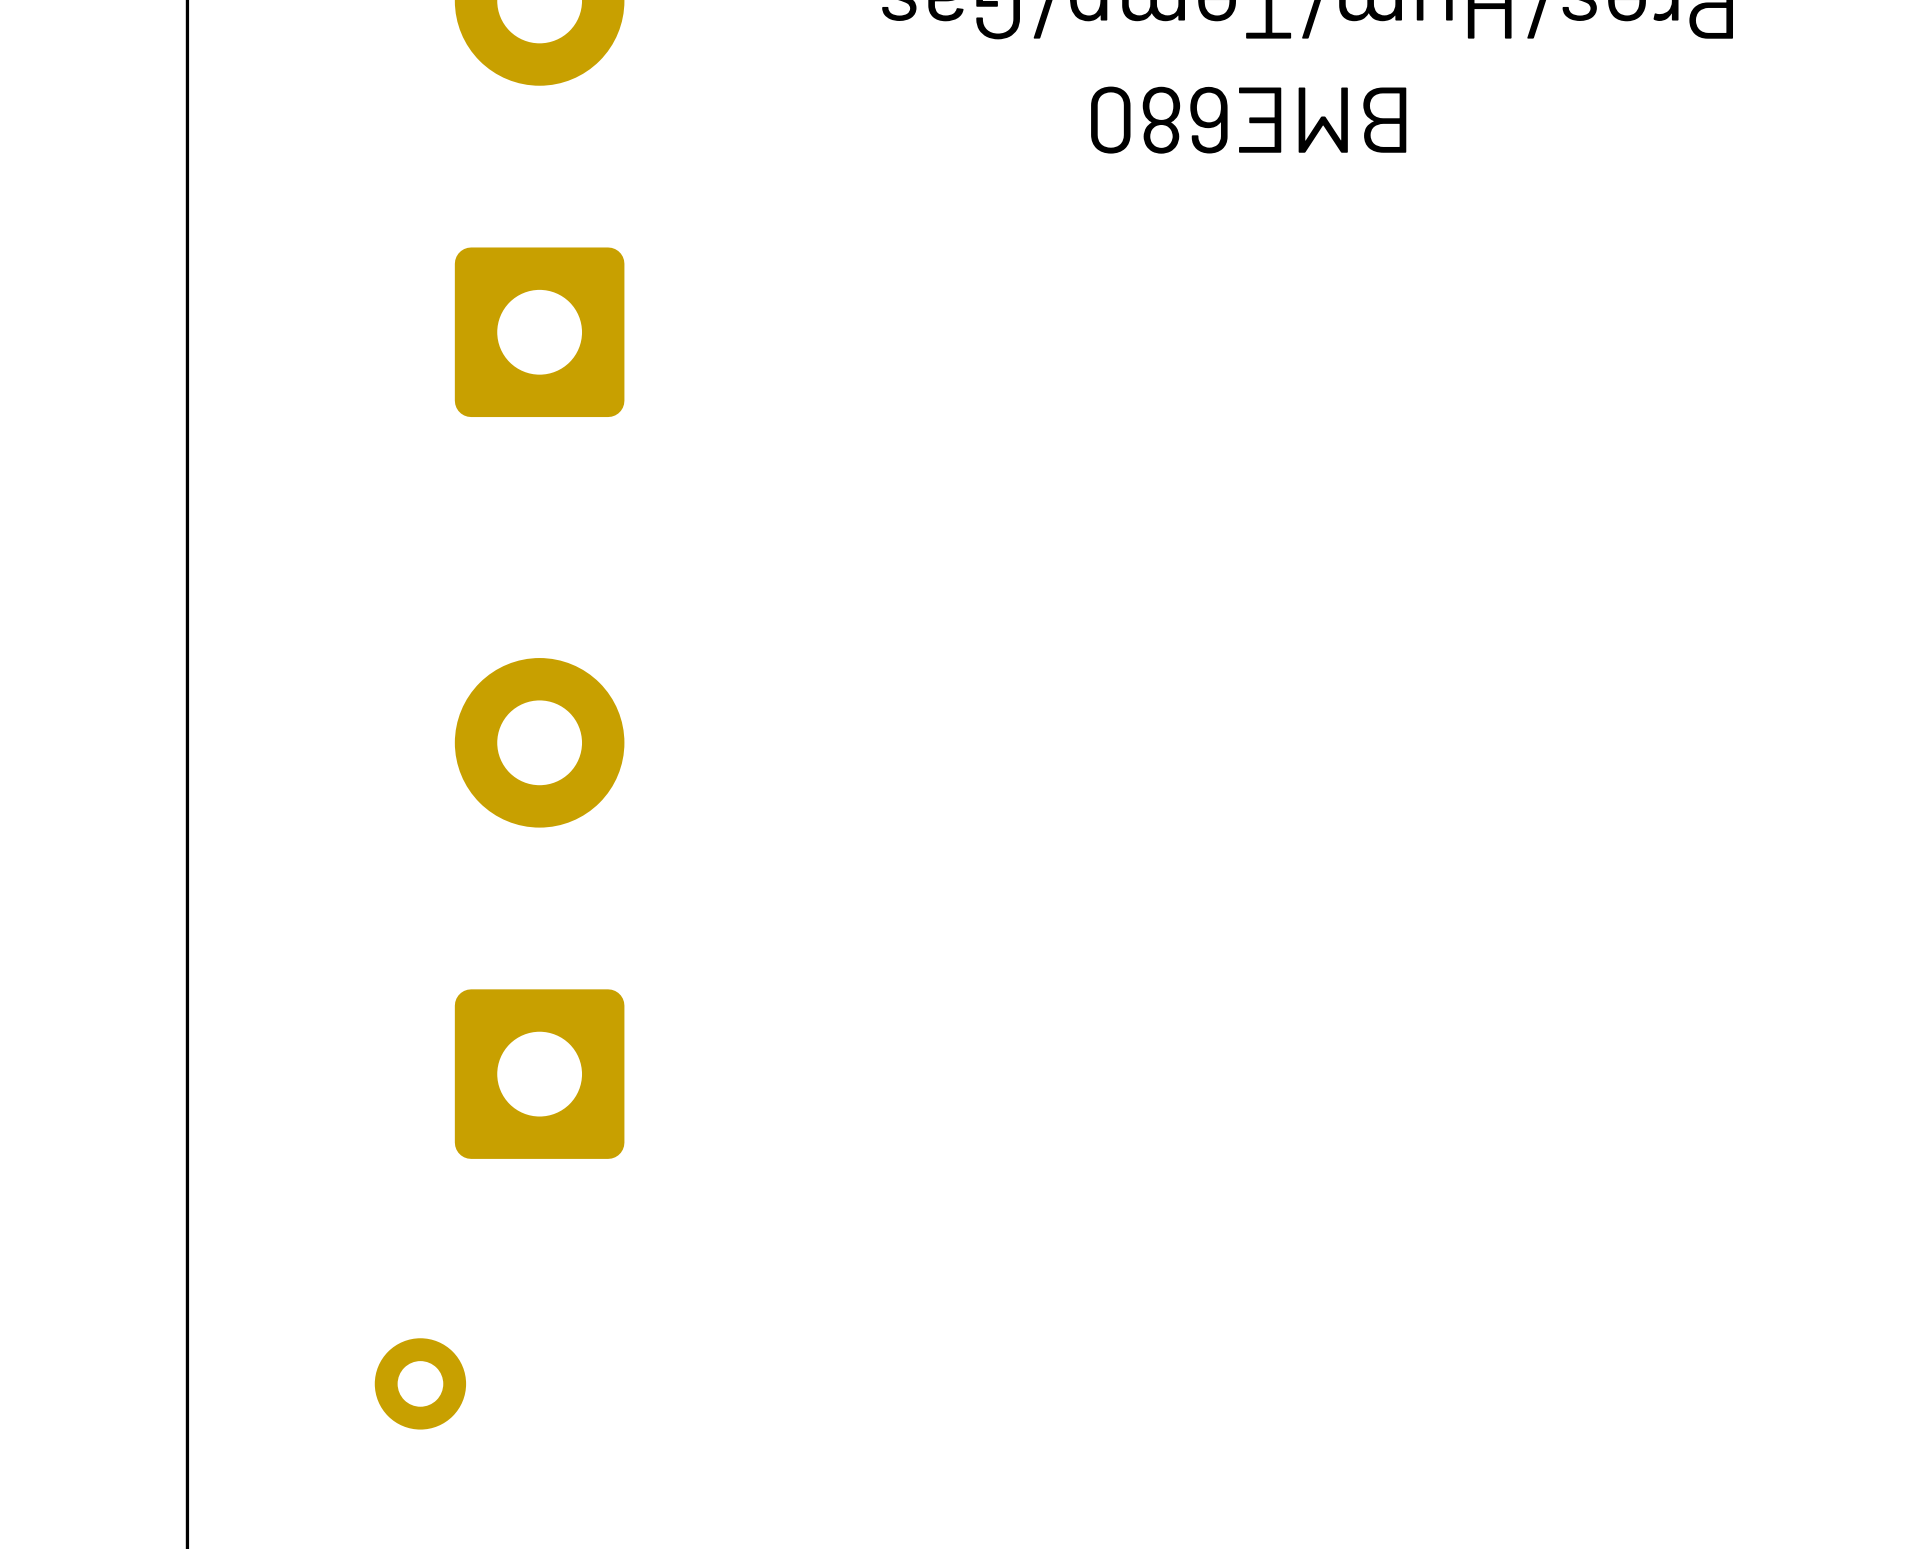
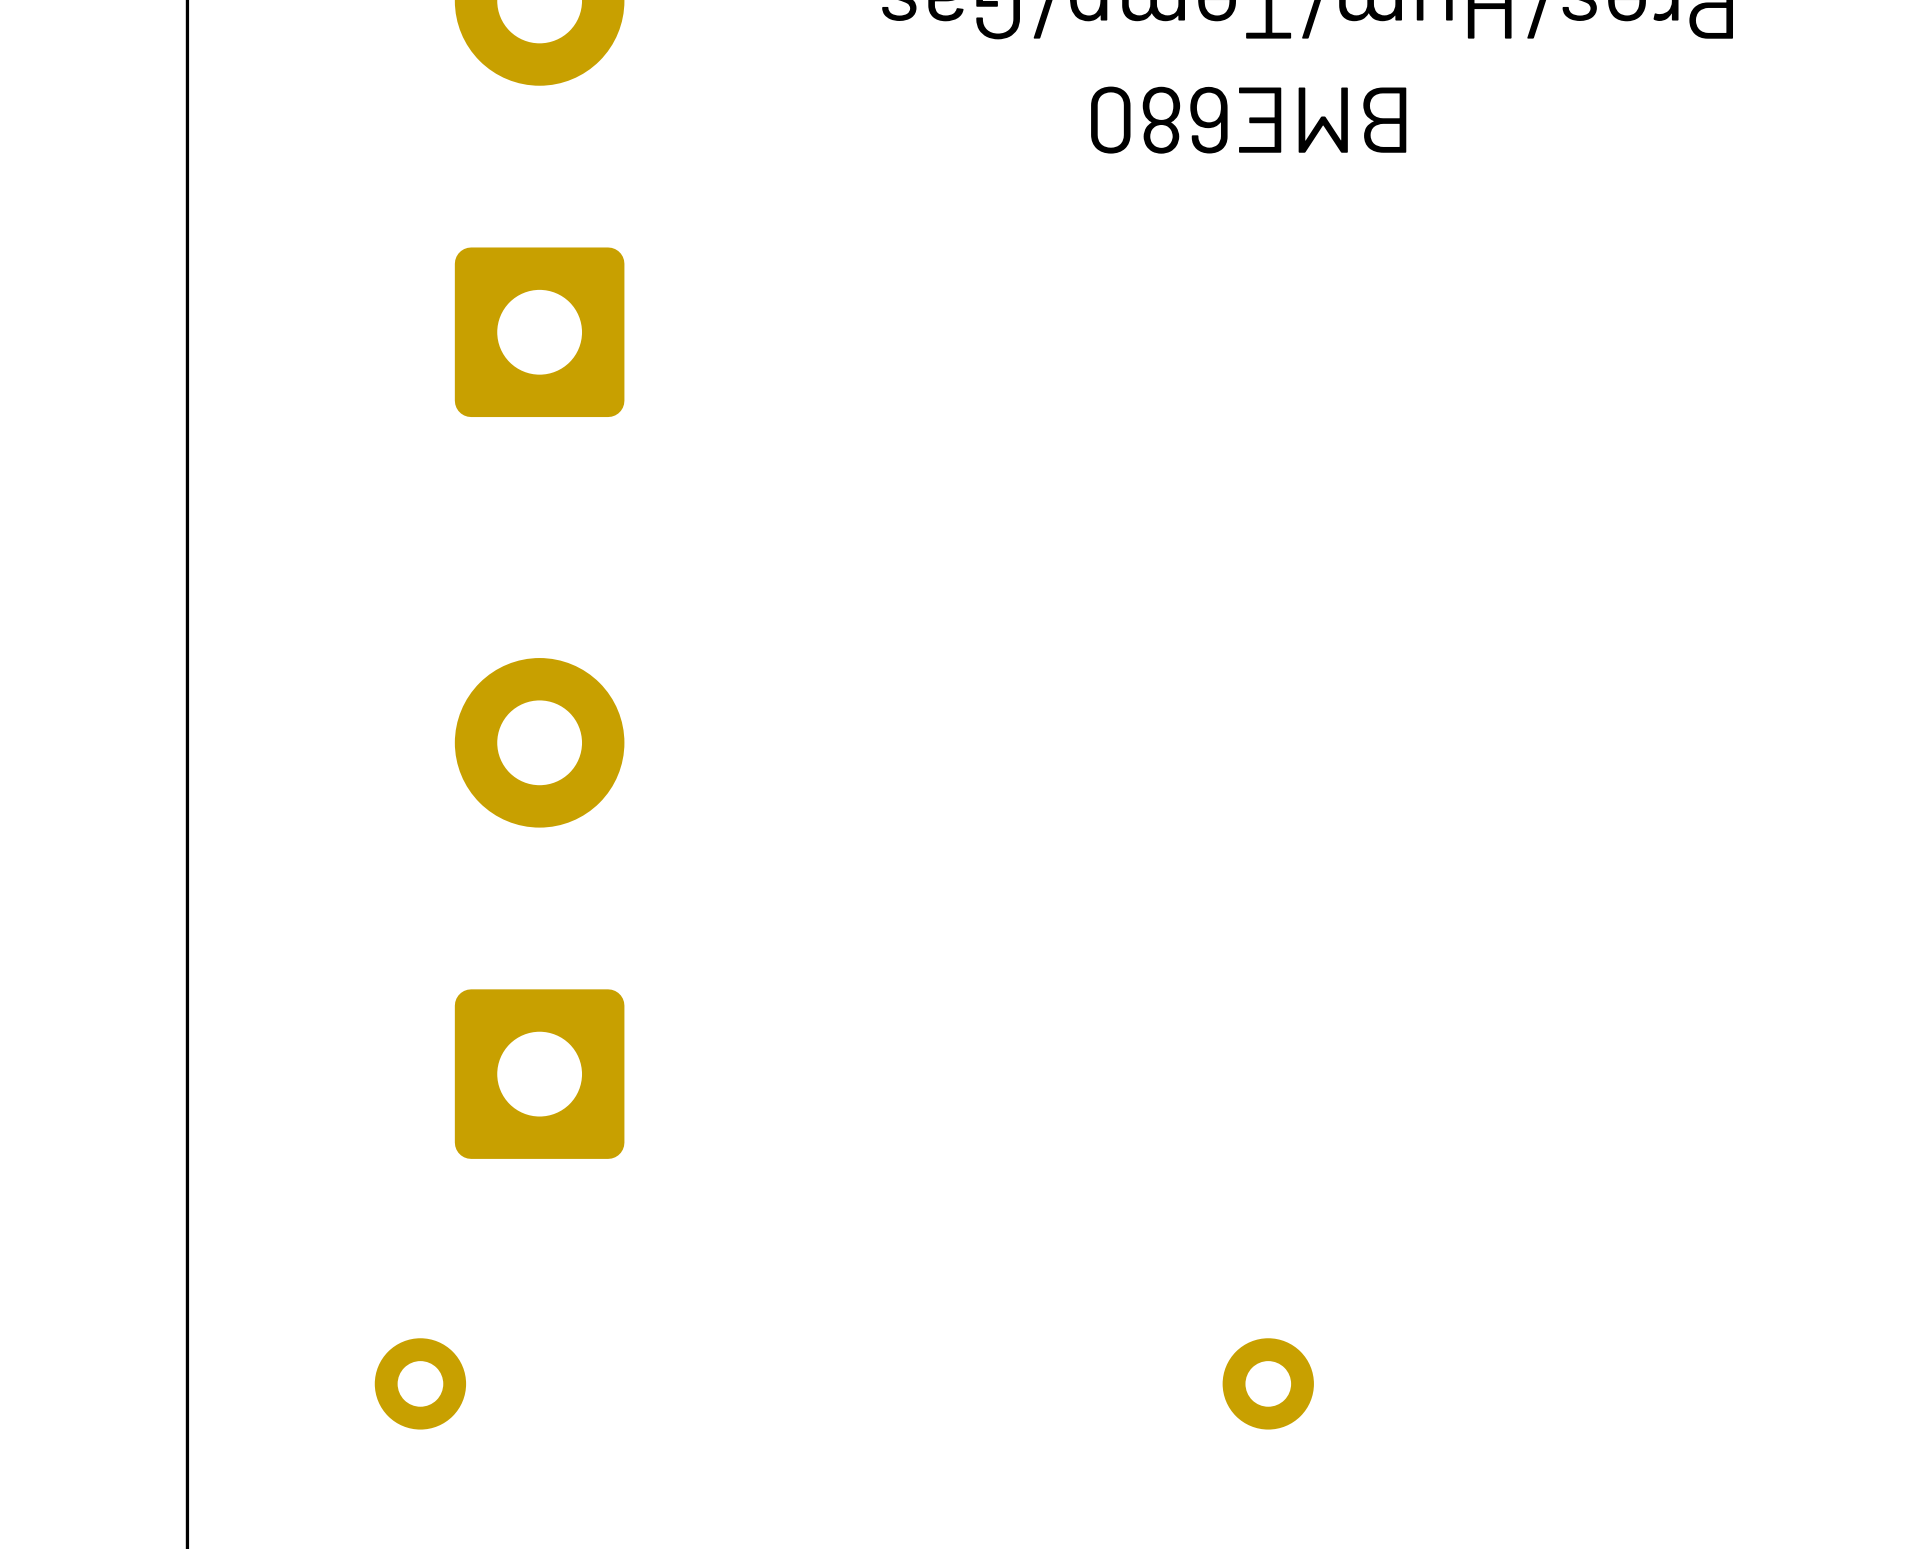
part: none -> (1268, 1383)

